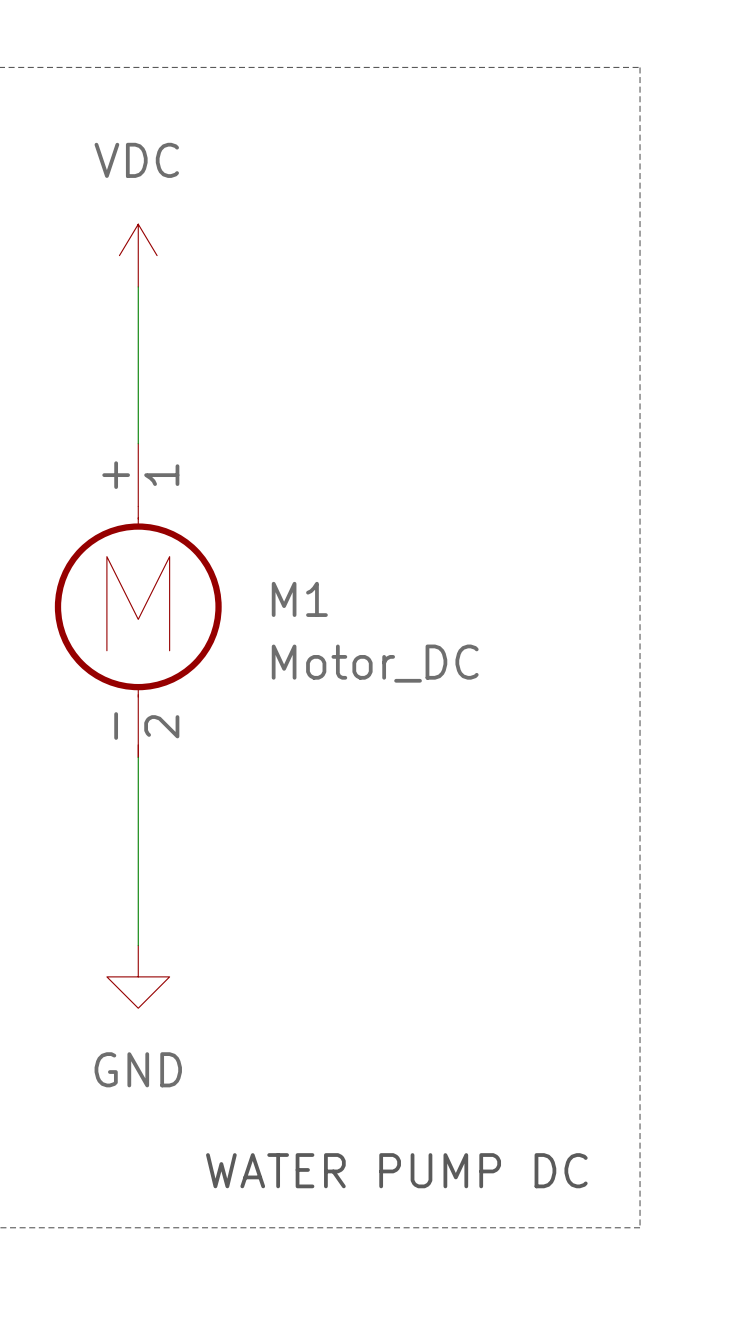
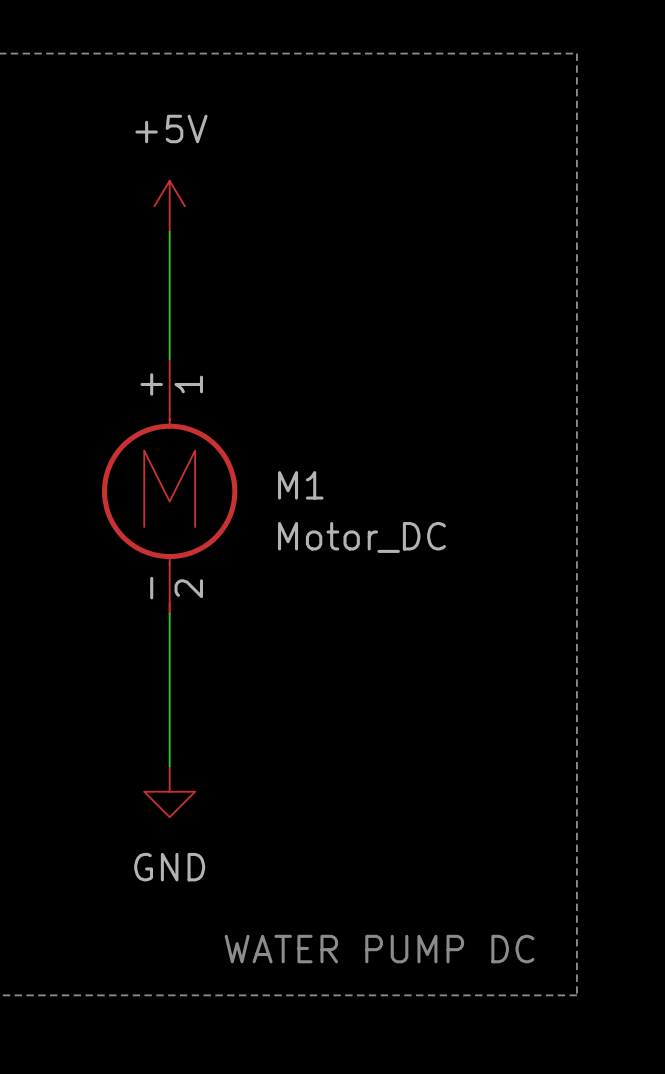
power symbol: VDC (138, 255) -> +5V (169, 206)

